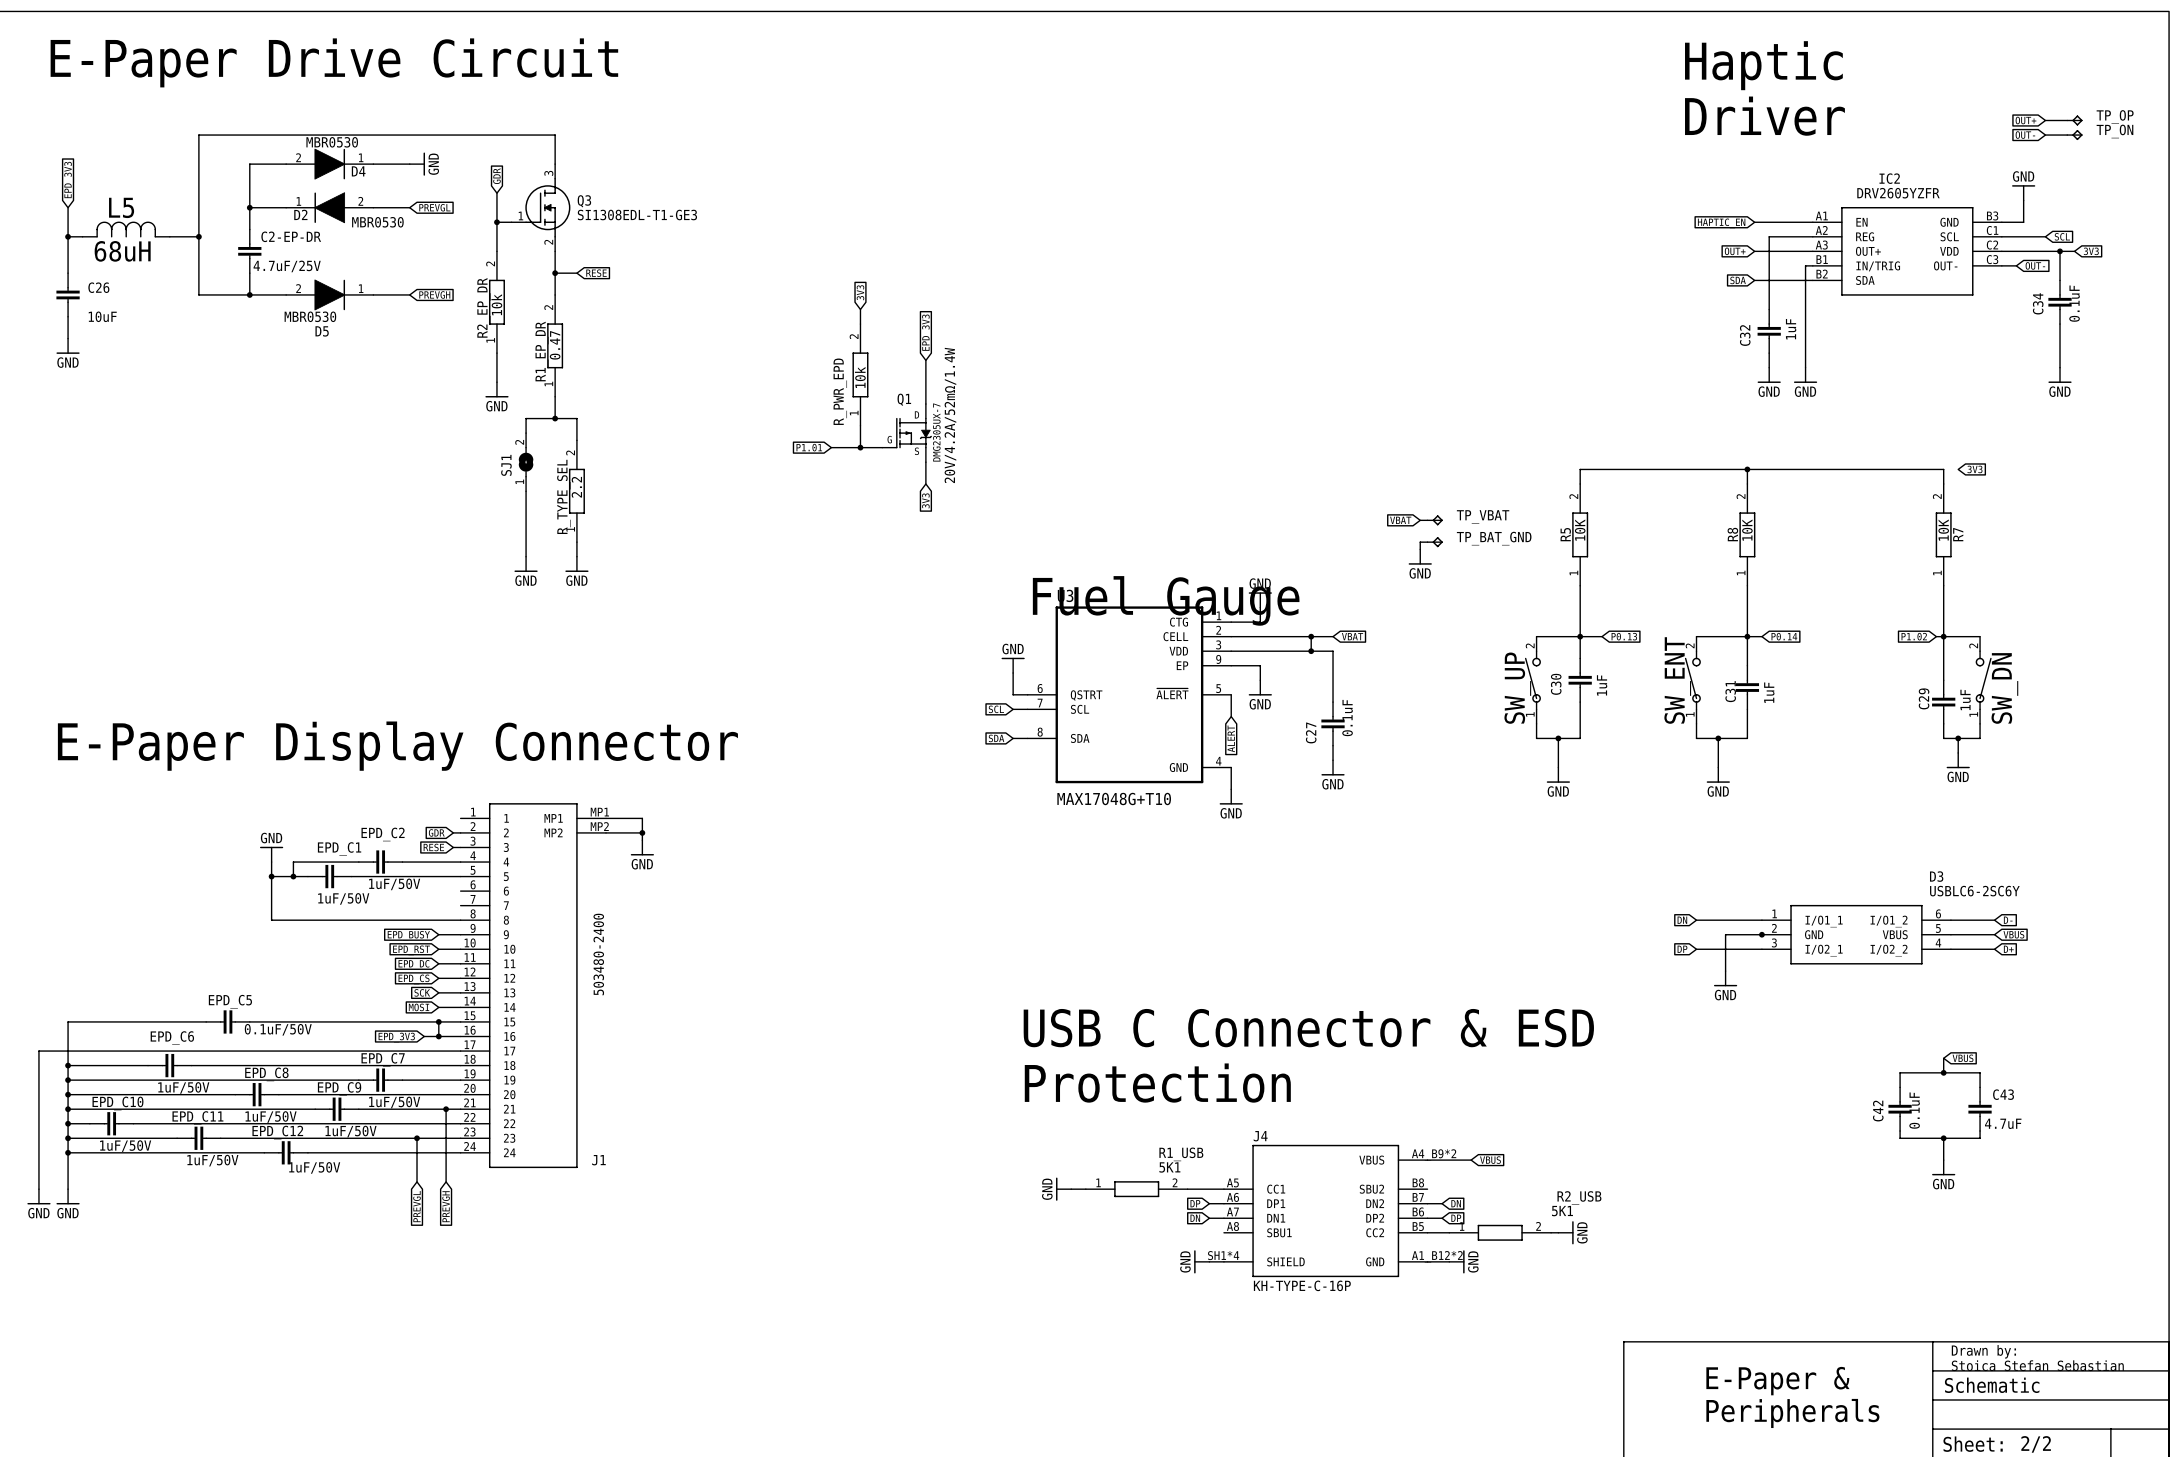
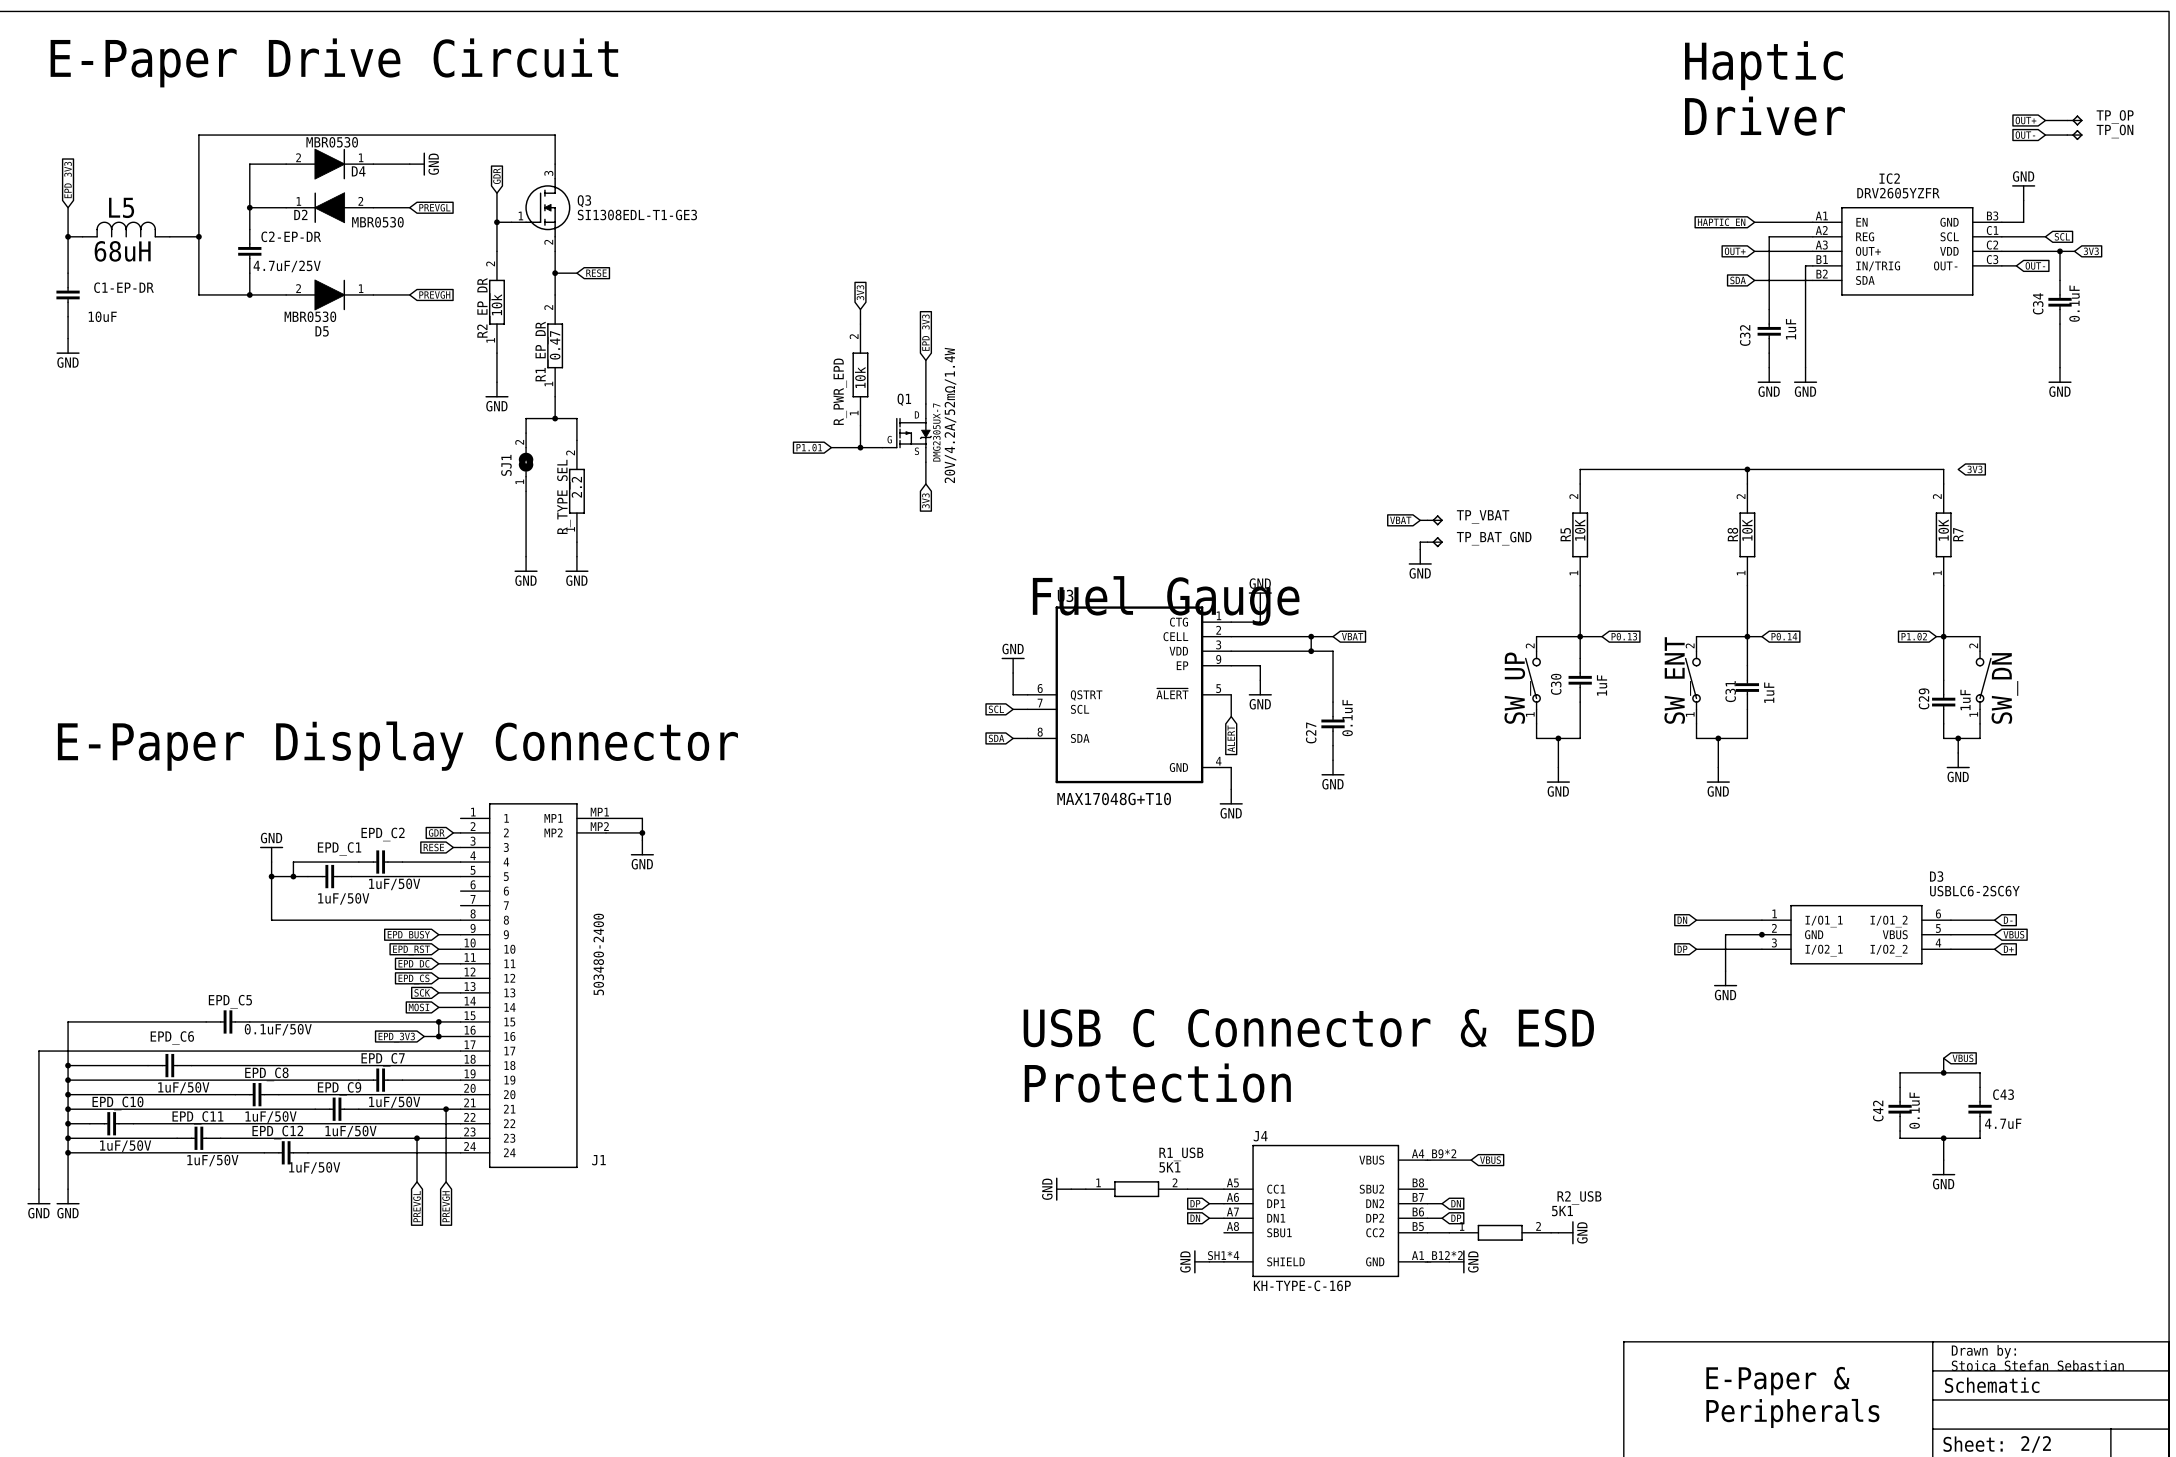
C26 name: C26 (98, 287) -> C1-EP-DR (124, 287)

